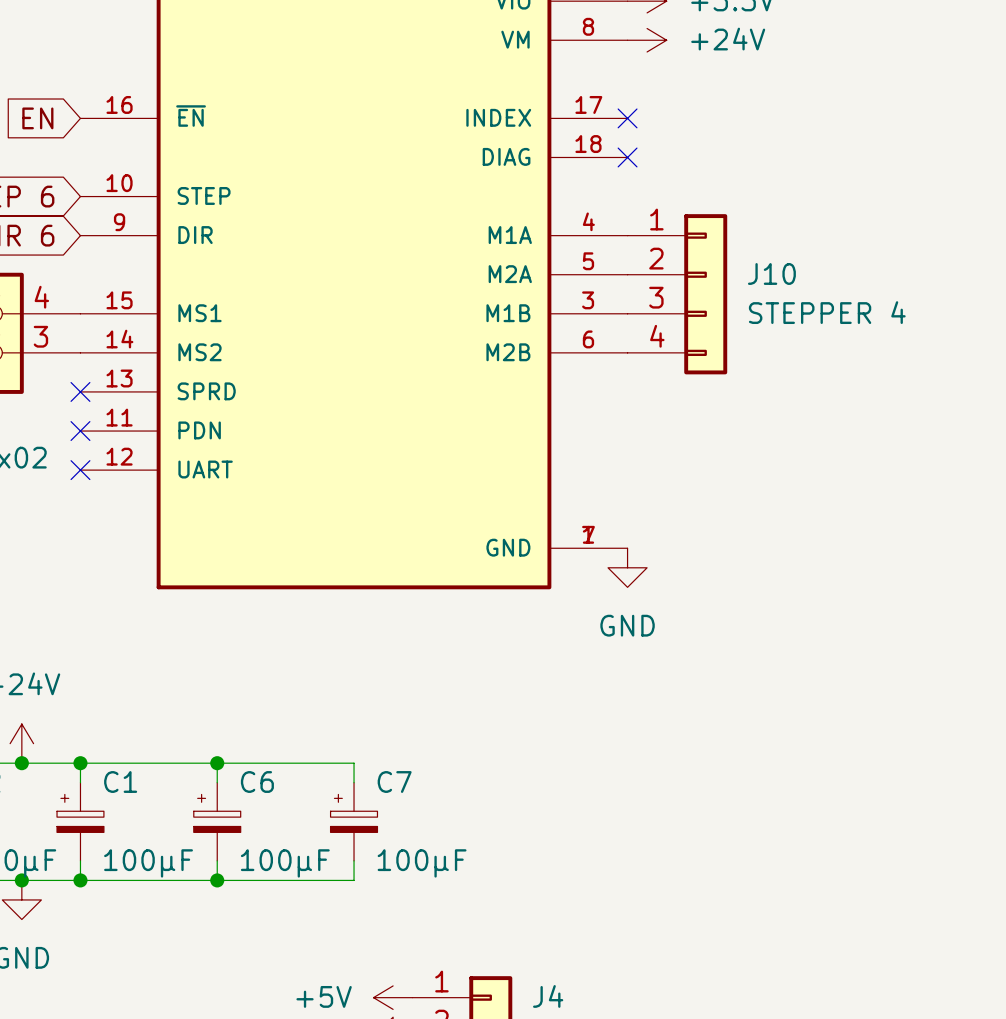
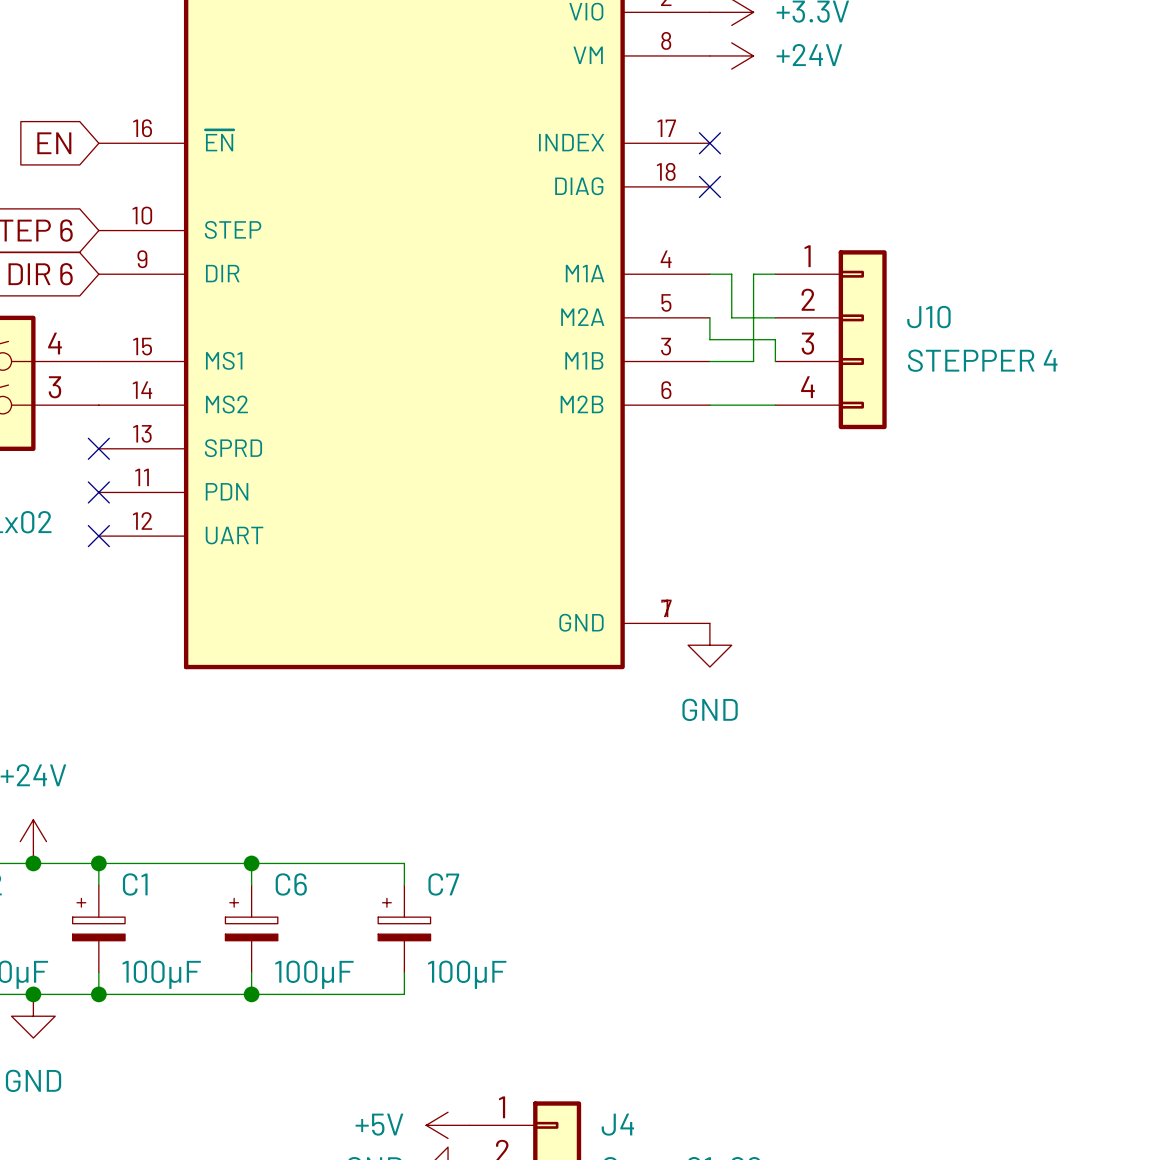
wire: none -> (709, 274) (731, 274) (731, 317) (775, 317)
wire: none -> (775, 274) (753, 274) (753, 361) (709, 361)
wire: none -> (709, 317) (709, 339) (775, 339) (775, 361)
J10 position: (677, 294) -> (831, 339)

